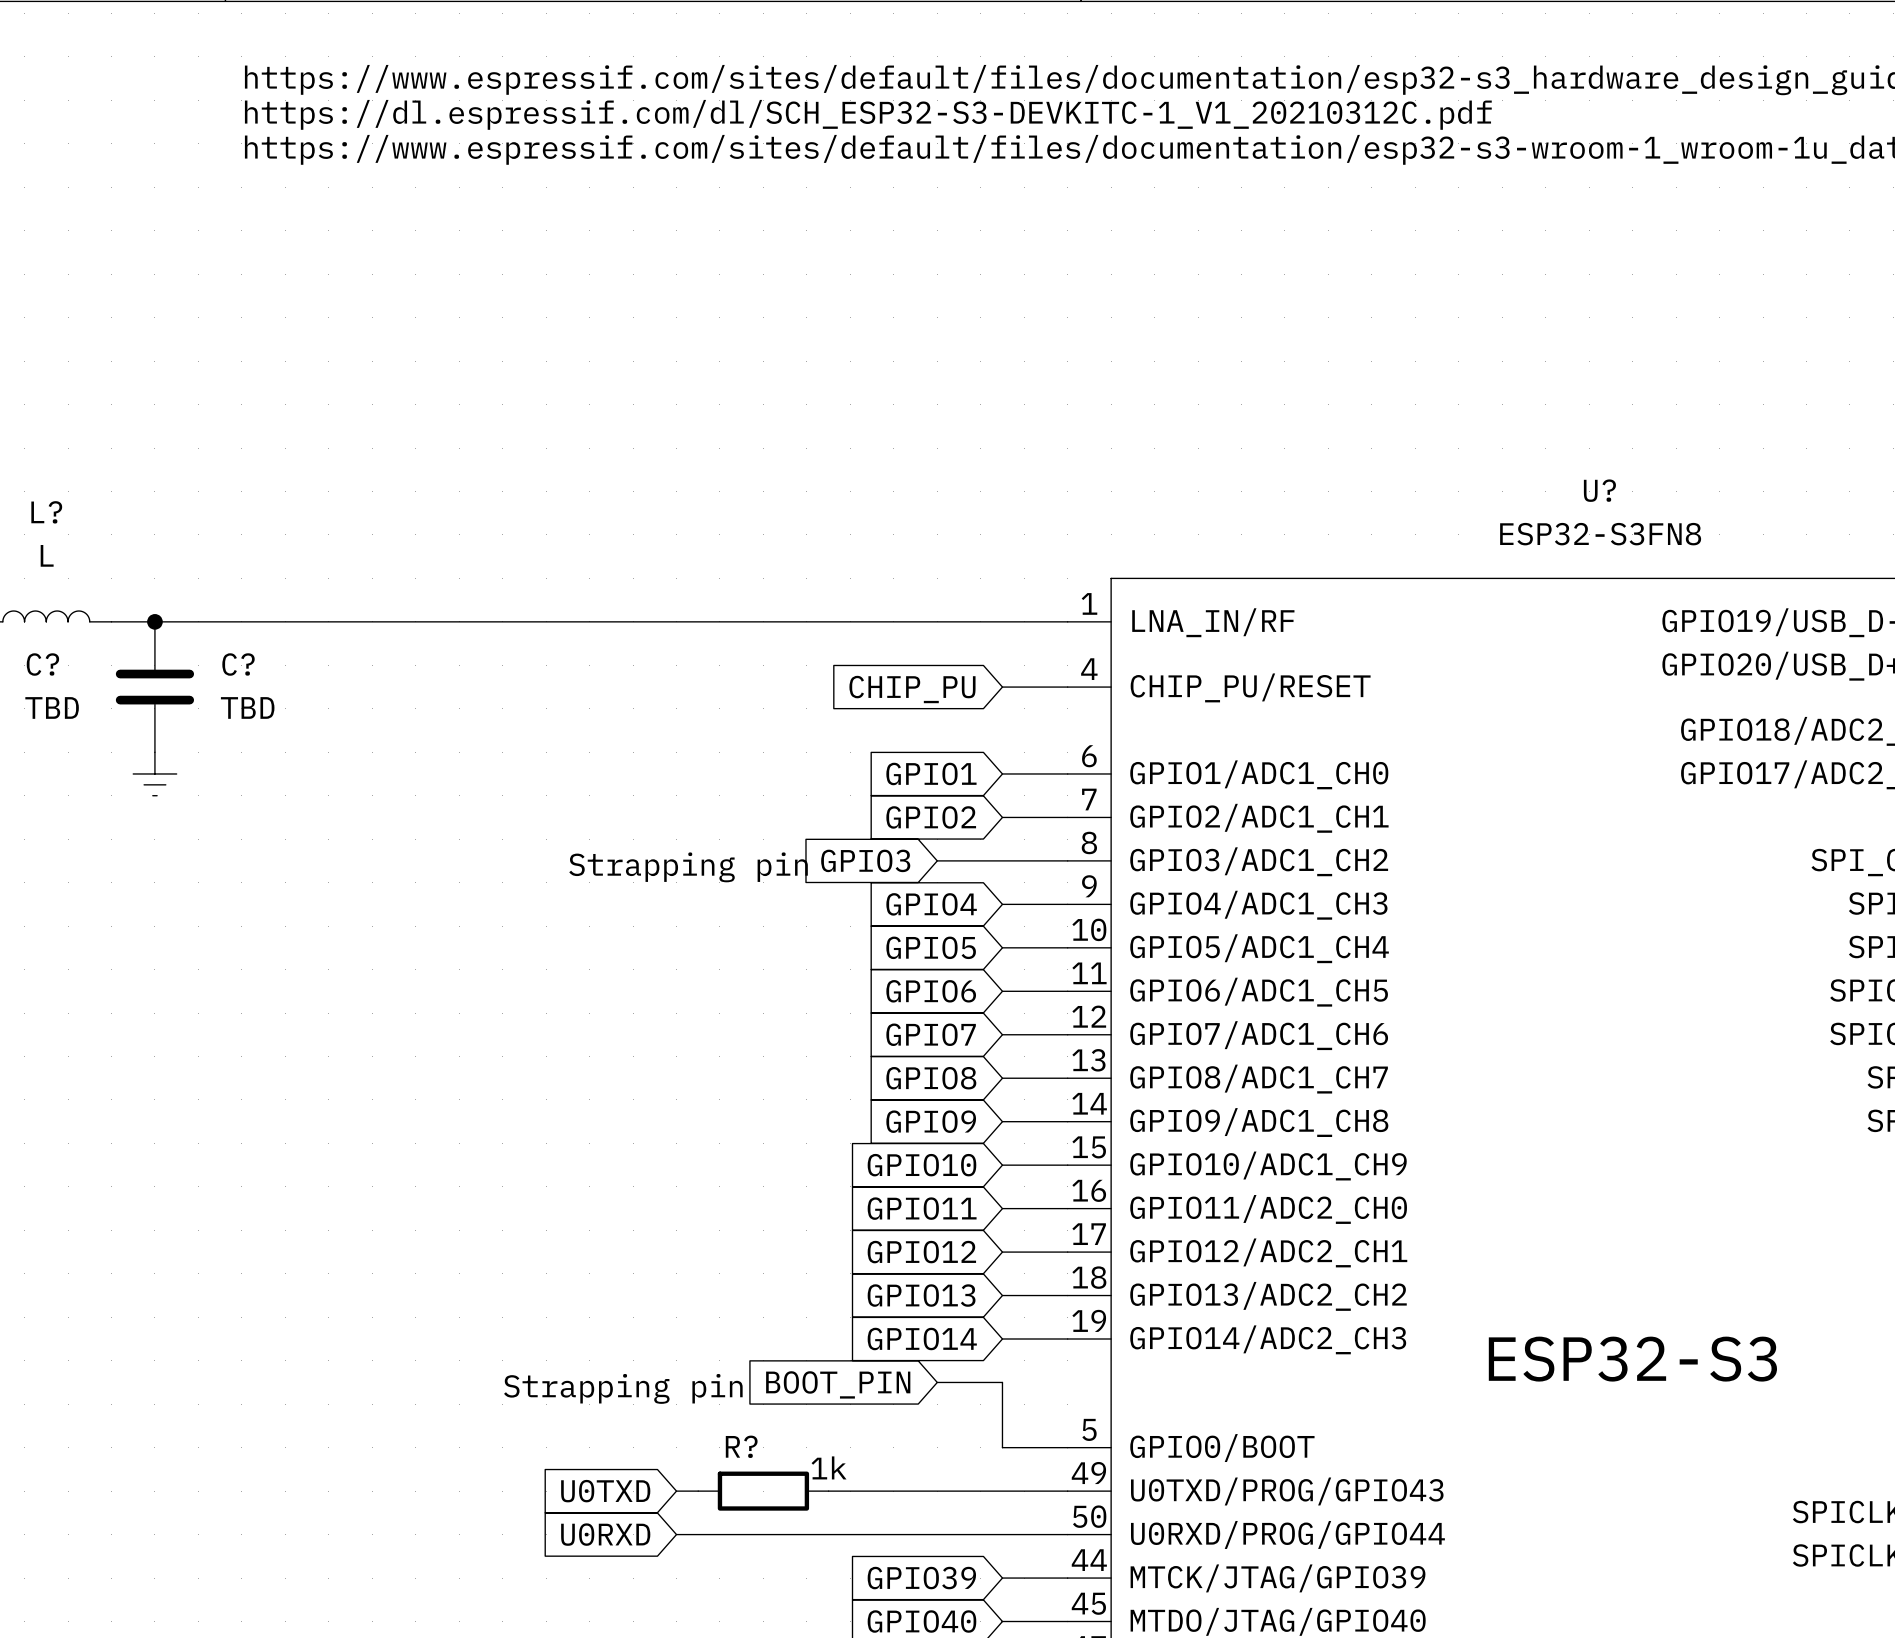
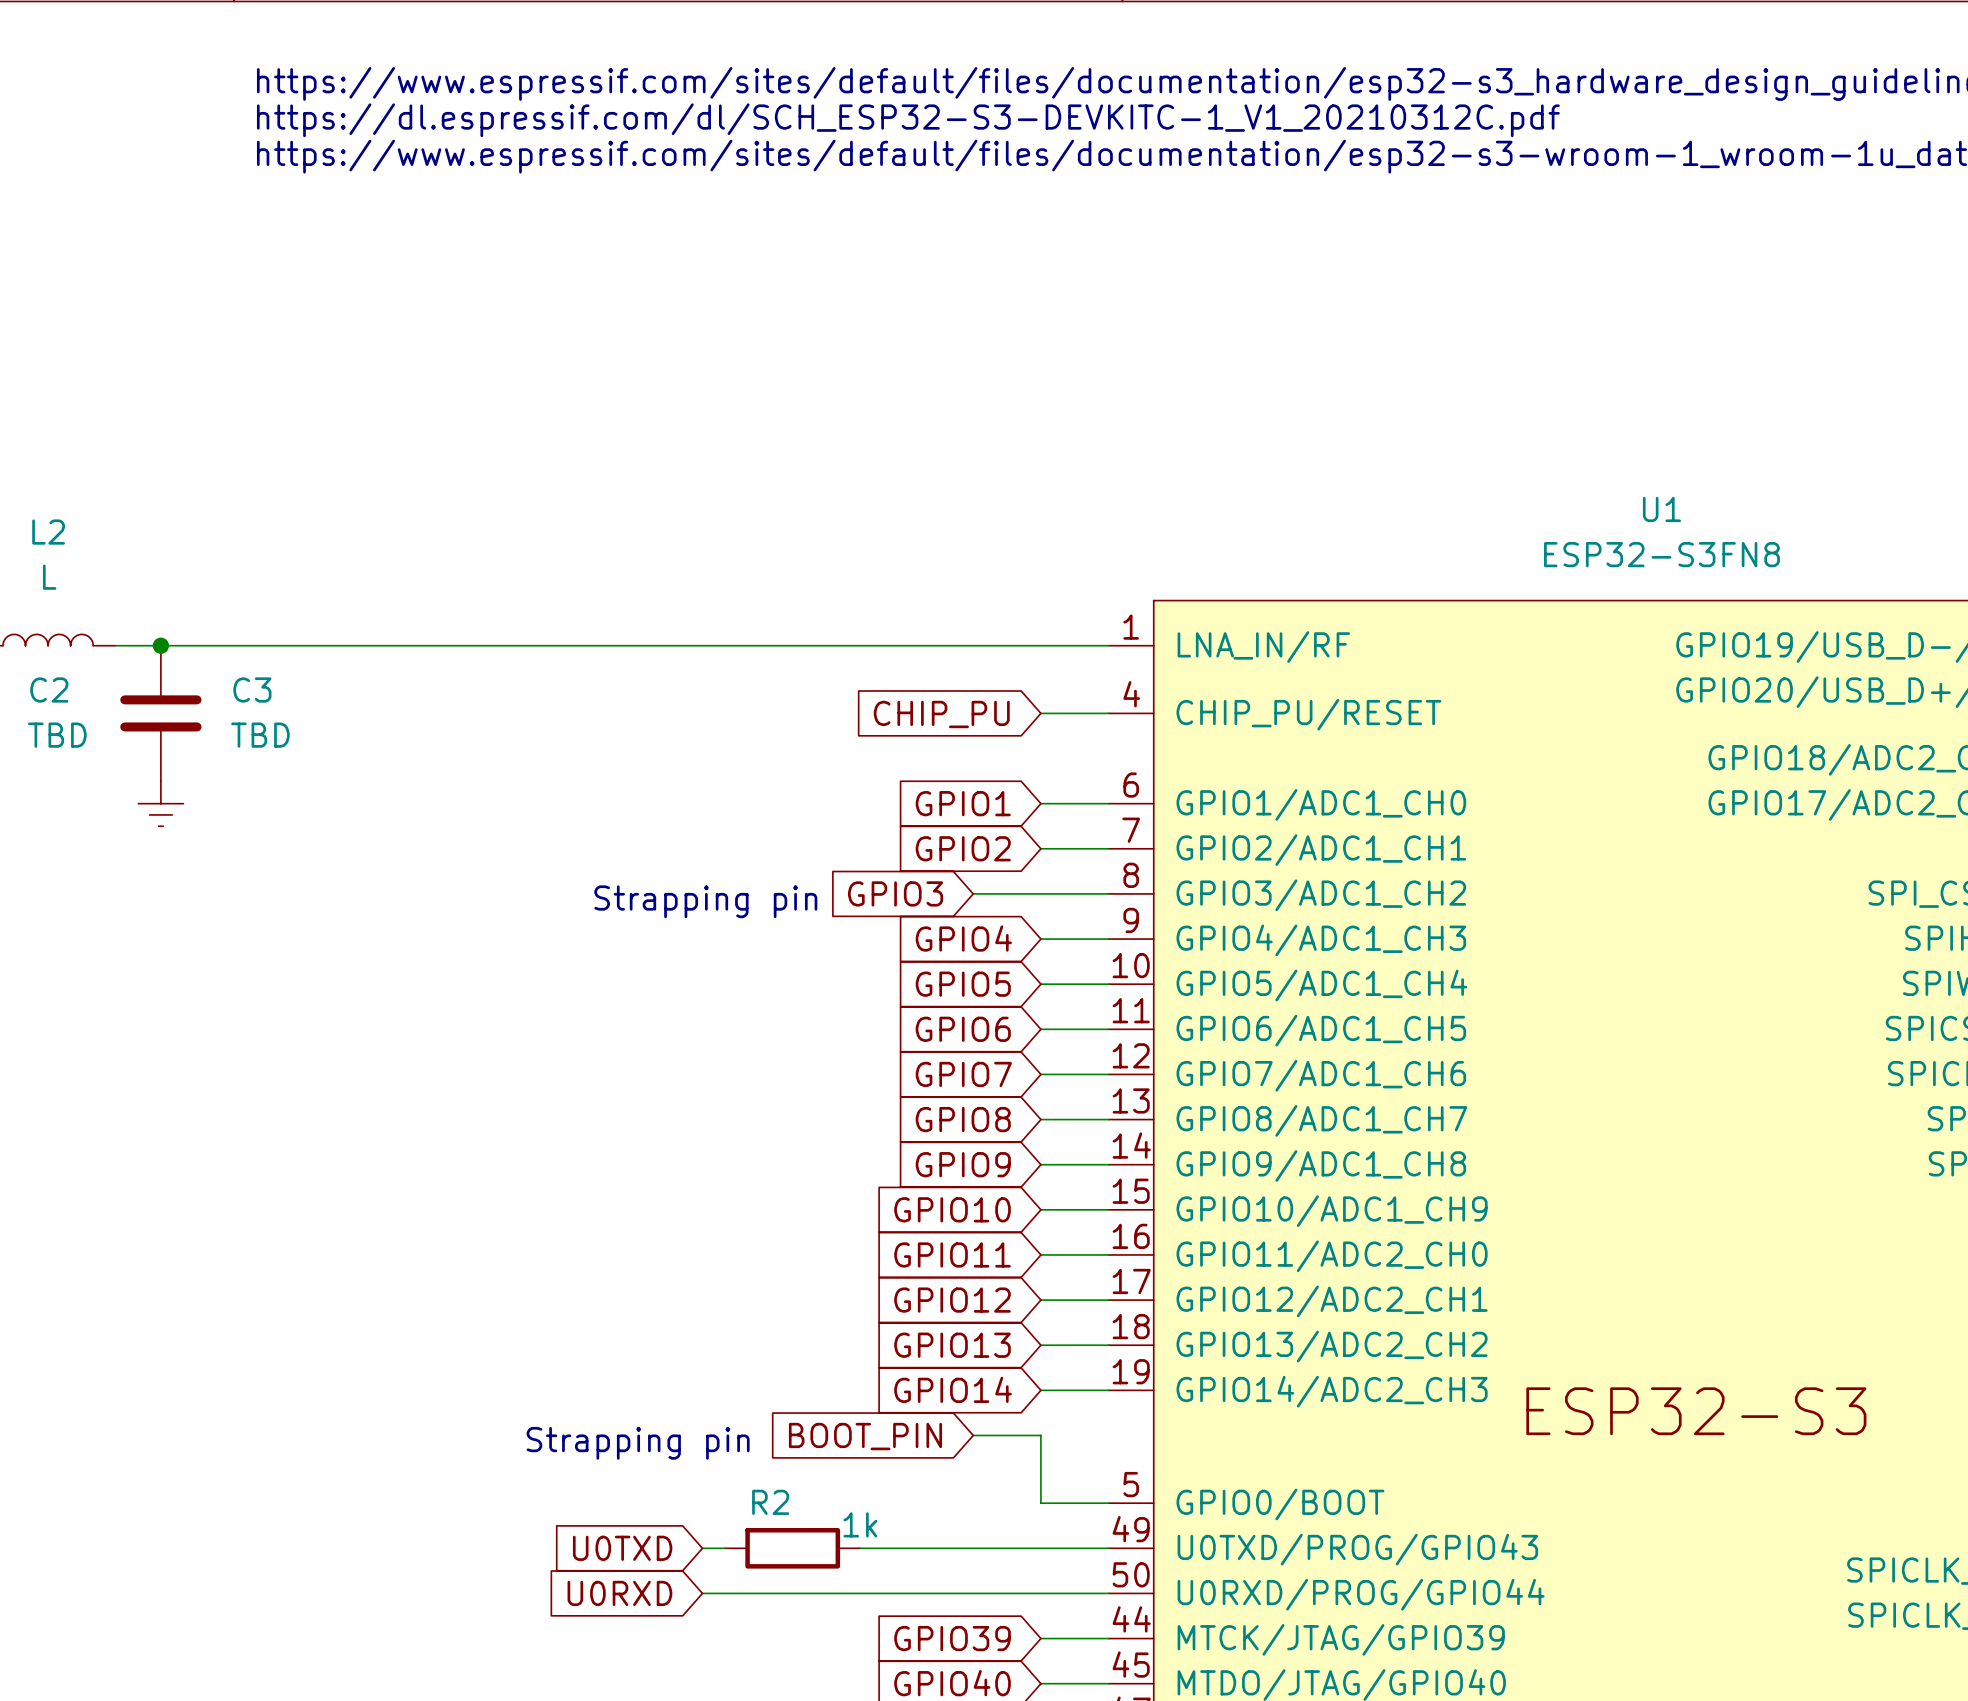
U? name: U? (1599, 490) -> U1 (1661, 509)
L? name: L? (46, 512) -> L2 (48, 532)
C? name: C? (42, 664) -> C2 (49, 690)
C? name: C? (238, 664) -> C3 (252, 690)
R? name: R? (741, 1446) -> R2 (770, 1502)

